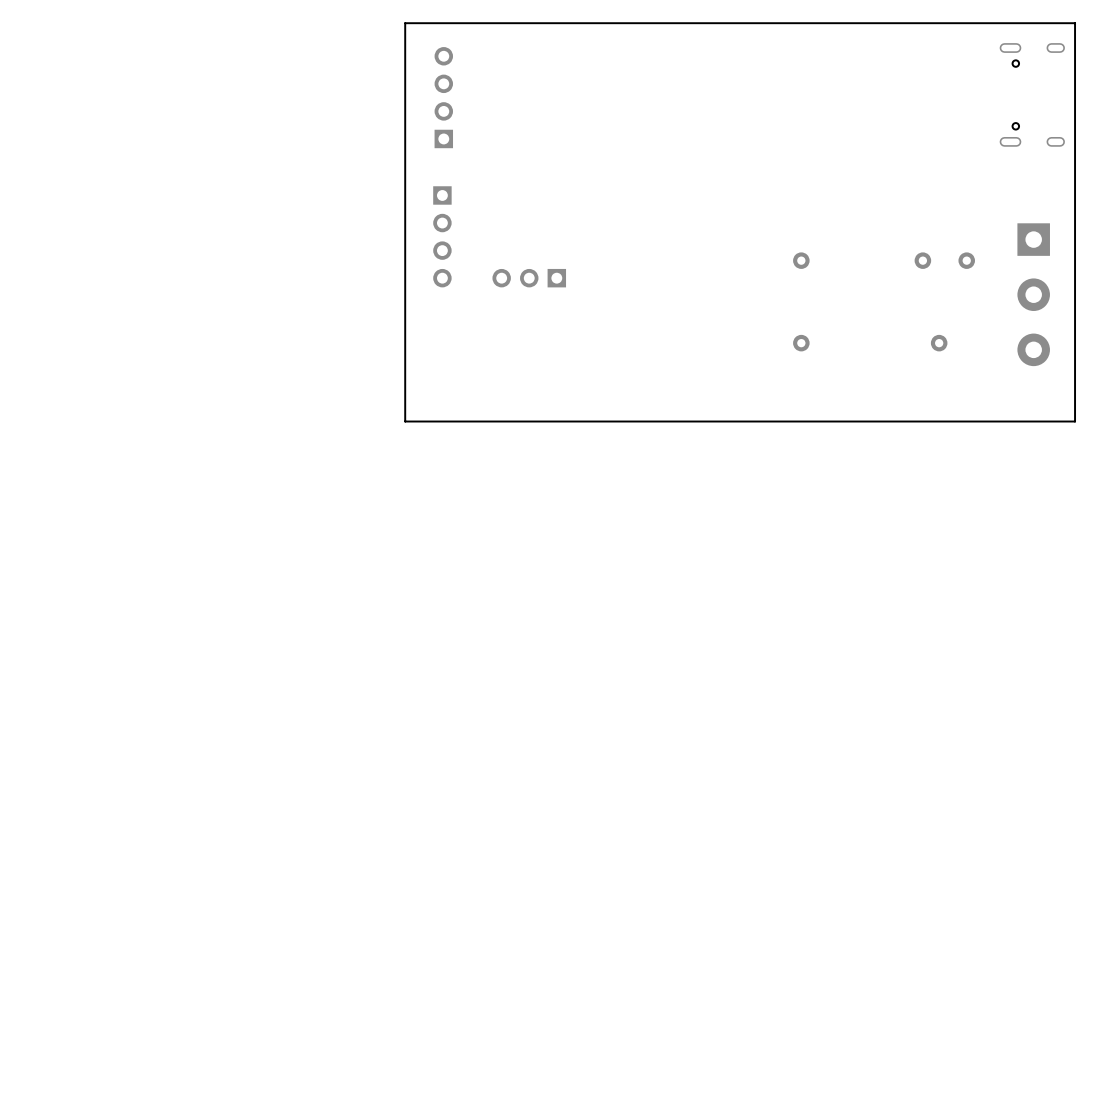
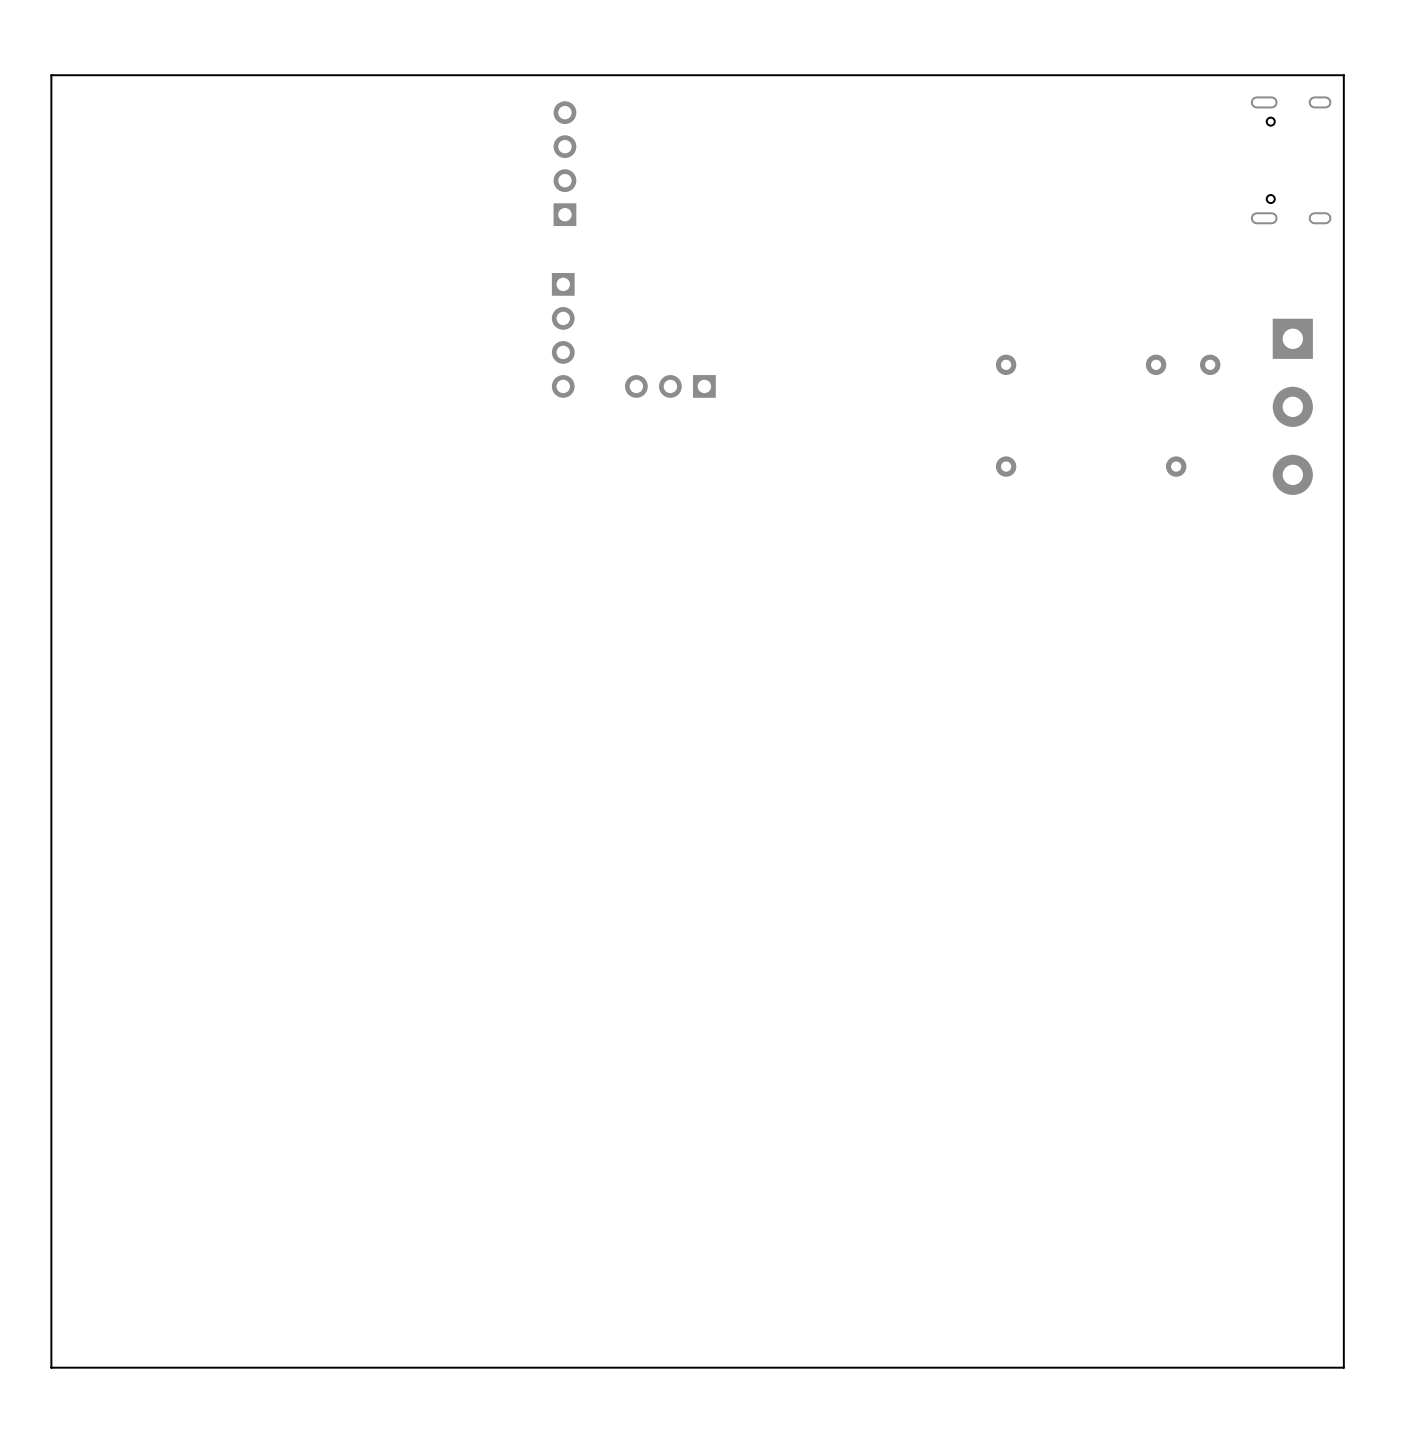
board edge: (1075, 25) (1075, 23) (405, 23) (405, 421) (1075, 421) -> (1343, 75) (51, 75) (51, 1367) (1343, 1367) (1343, 563)

